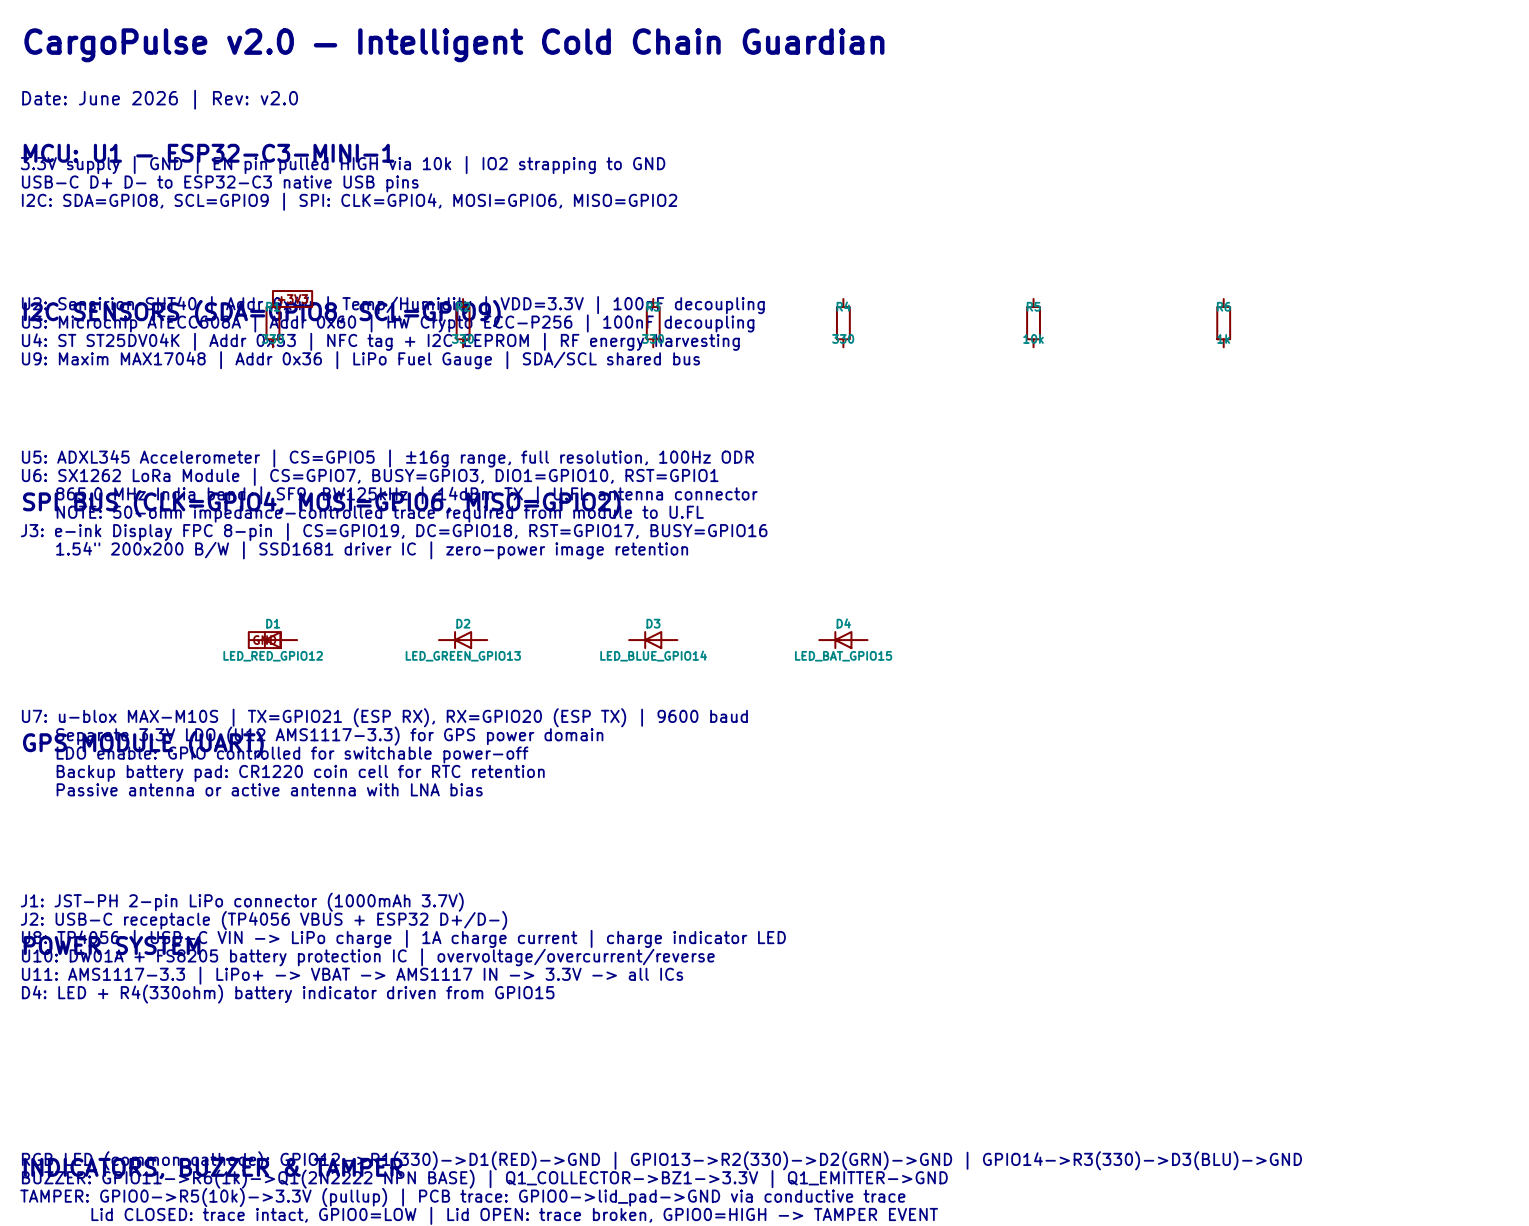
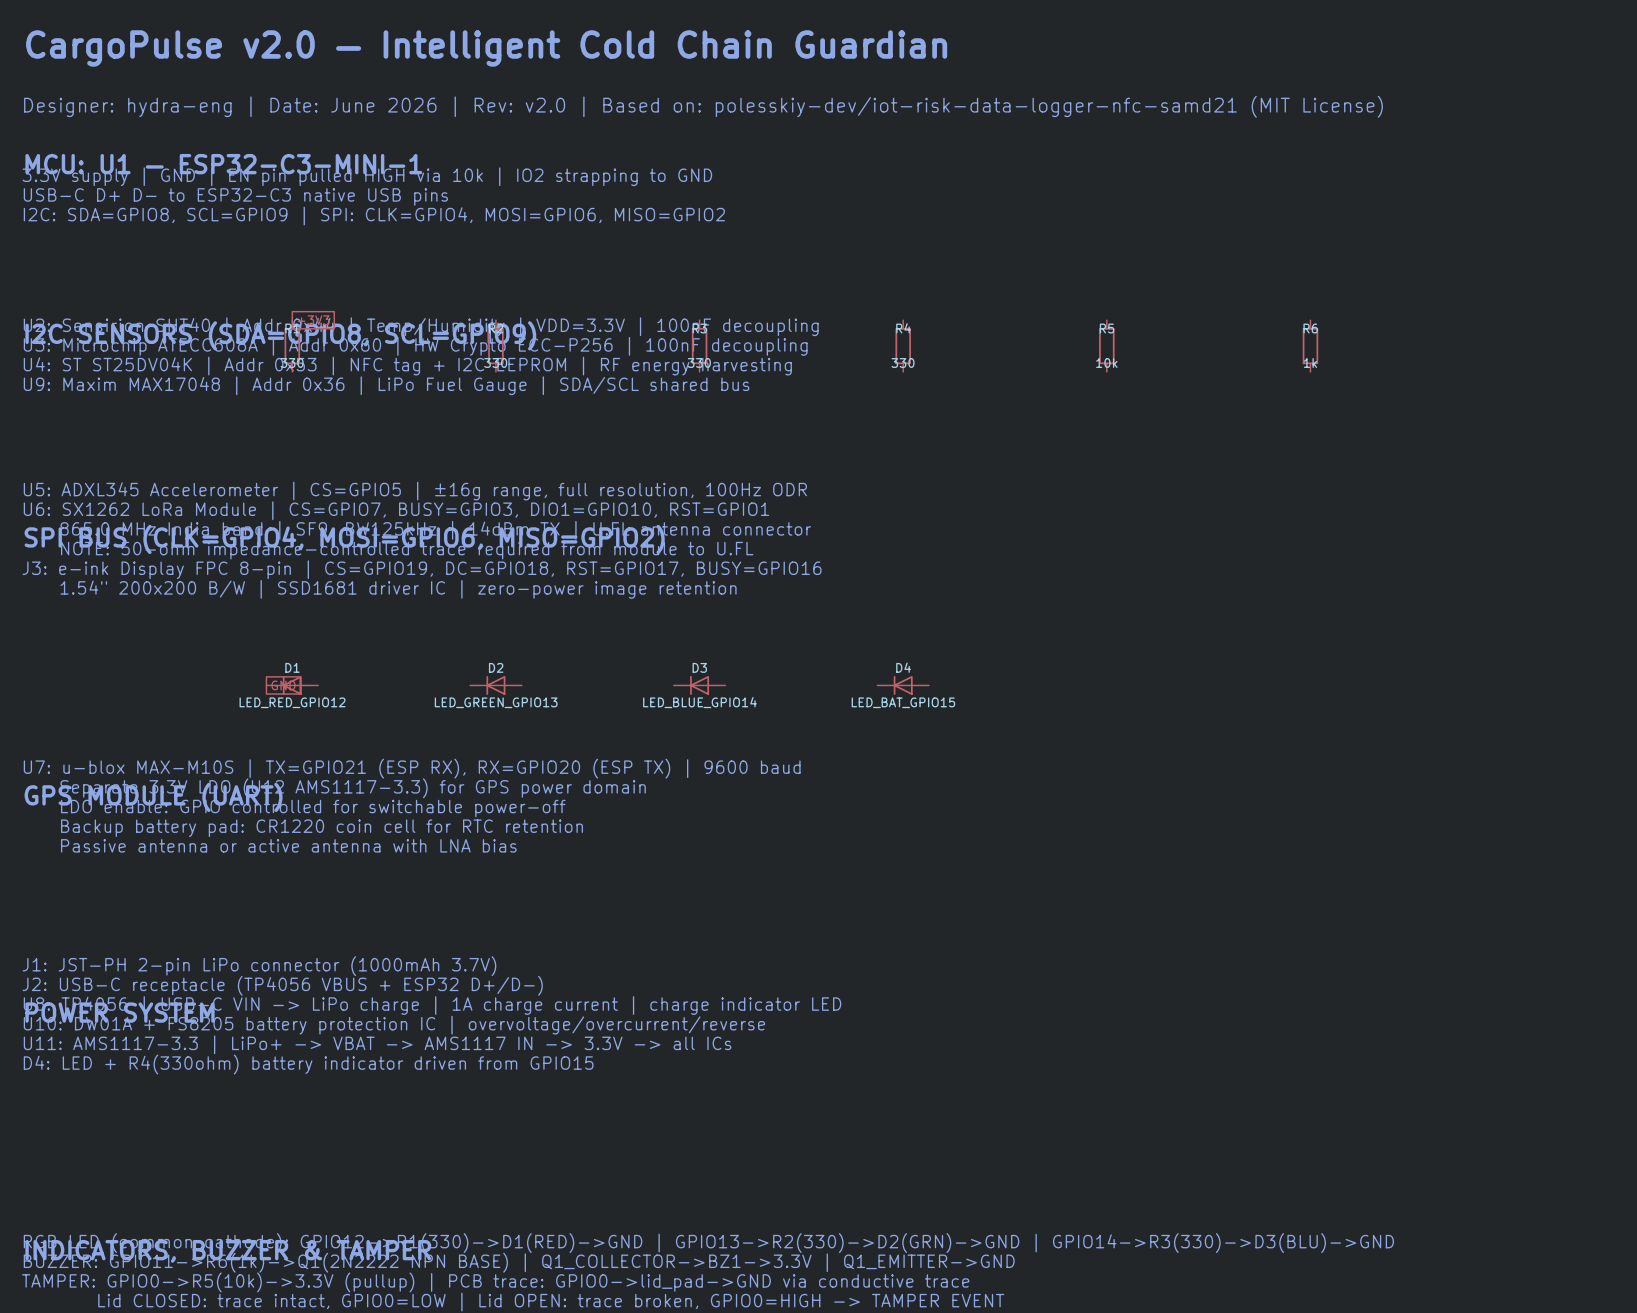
text: Date: June 2026 | Rev: v2.0 (160, 99) -> Designer: hydra-eng | Date: June 2026 | Rev: v2.0 | Based on: polesskiy-dev/iot-risk-data-logger-nfc-samd21 (MIT License) (703, 106)

